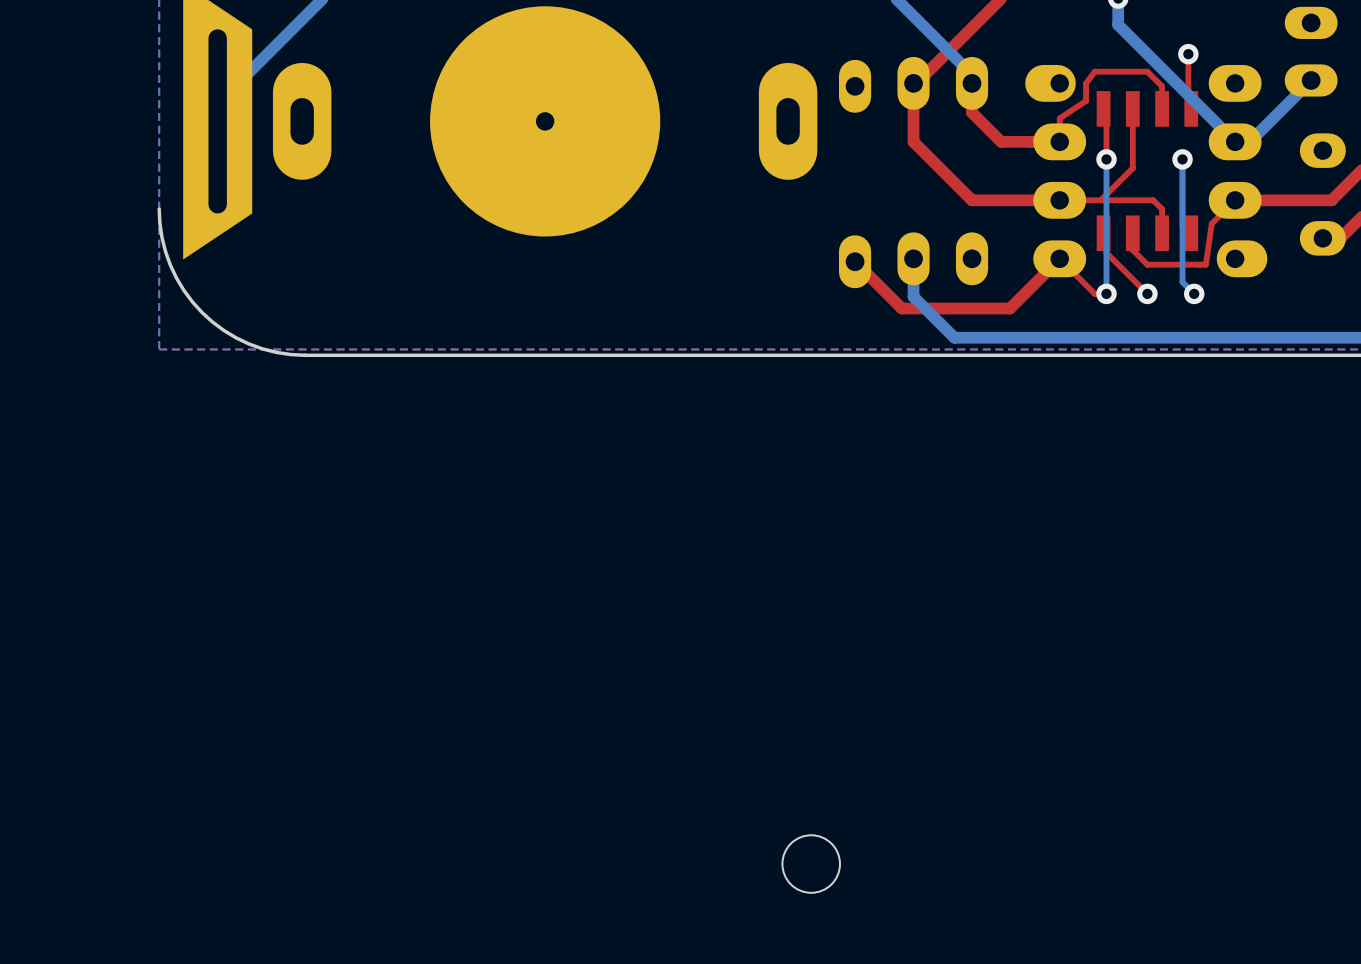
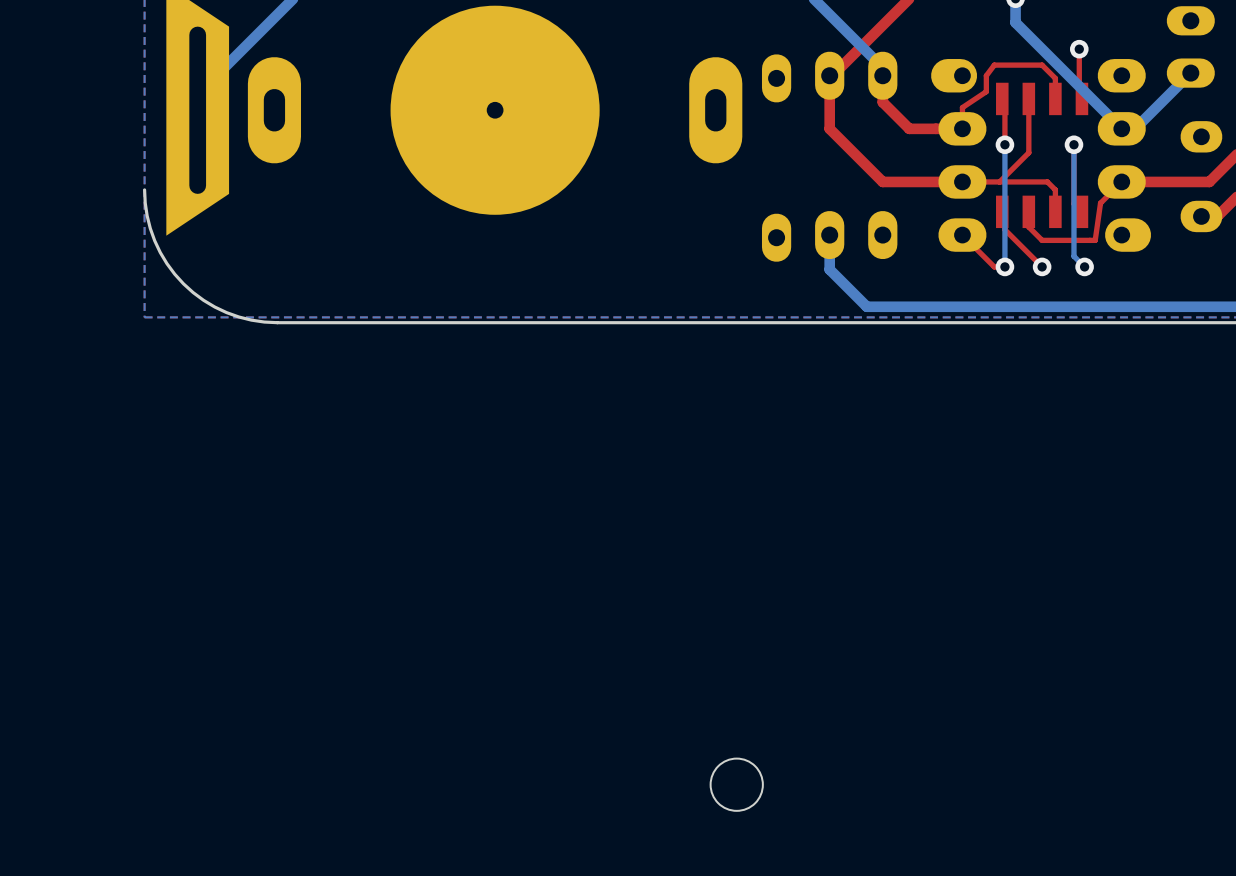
top track: (1059, 258) (1010, 308) (901, 308) (855, 261) -> none

